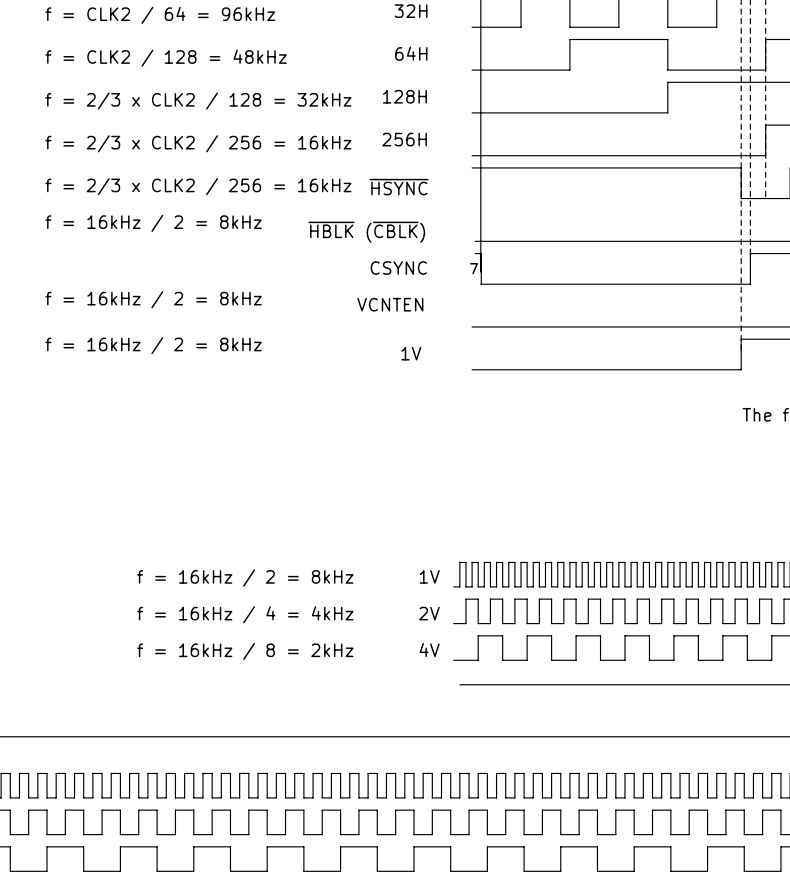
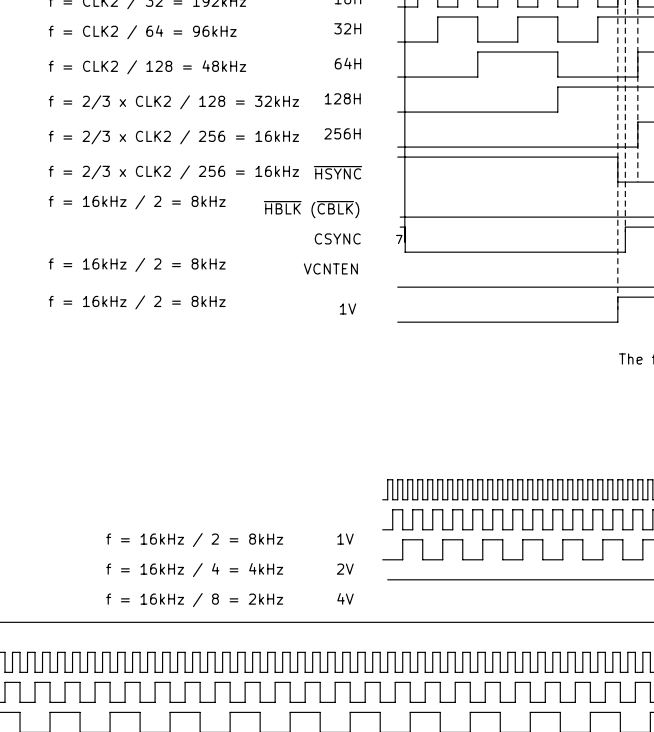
text position: 1V (429, 576) -> 1V (345, 539)
text position: f = 16kHz / 2 = 8kHz (245, 578) -> f = 16kHz / 2 = 8kHz (194, 540)
text position: 2V (429, 613) -> 2V (345, 569)
text position: f = 16kHz / 4 = 4kHz (245, 614) -> f = 16kHz / 4 = 4kHz (194, 570)
text position: 4V (429, 649) -> 4V (345, 598)
text position: f = 16kHz / 8 = 2kHz (245, 651) -> f = 16kHz / 8 = 2kHz (194, 600)

